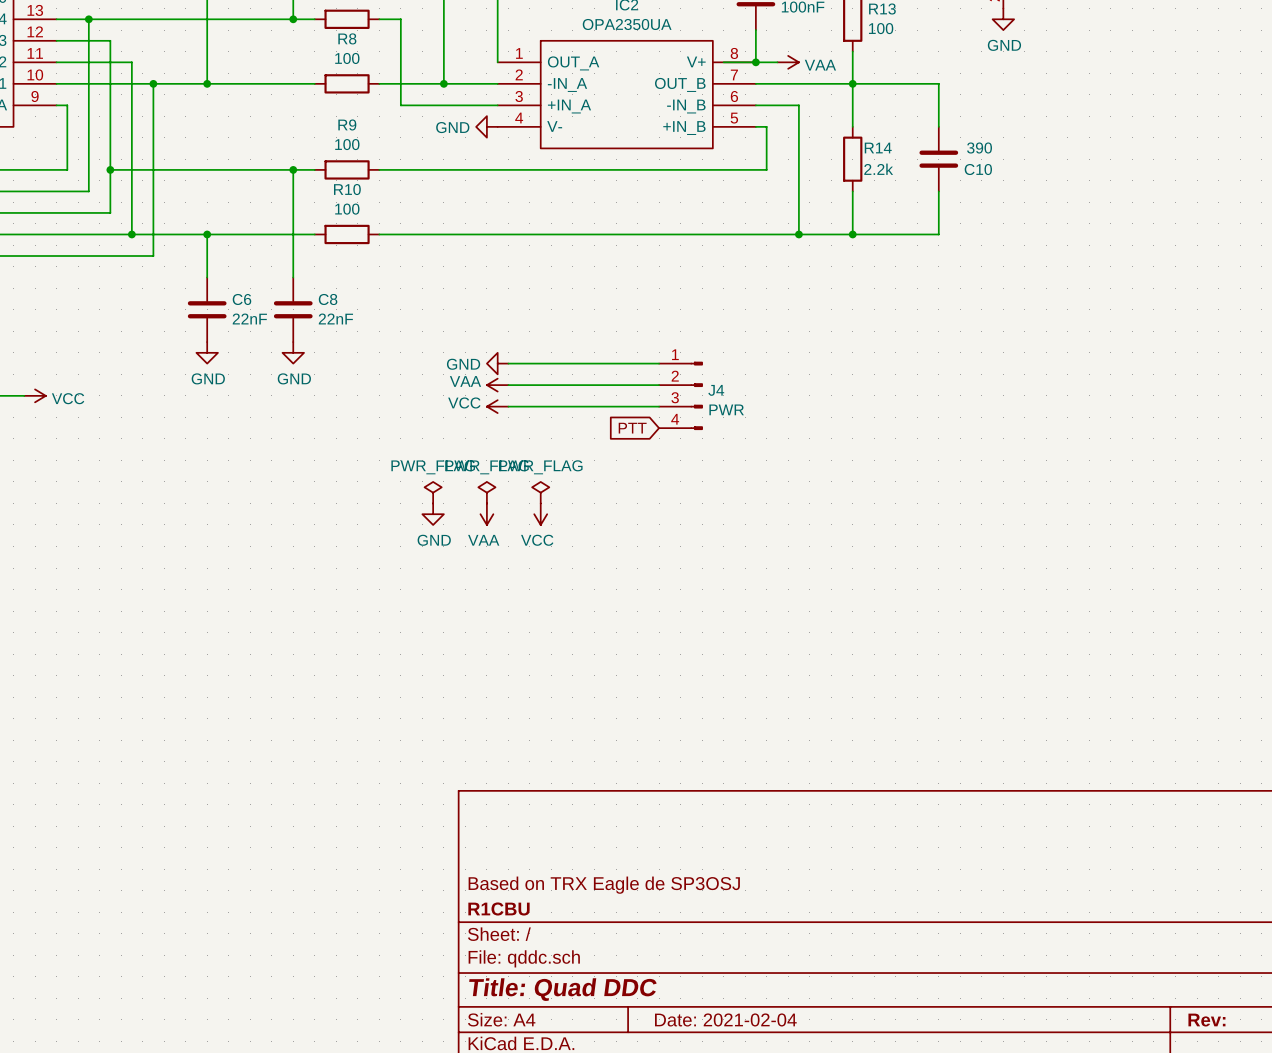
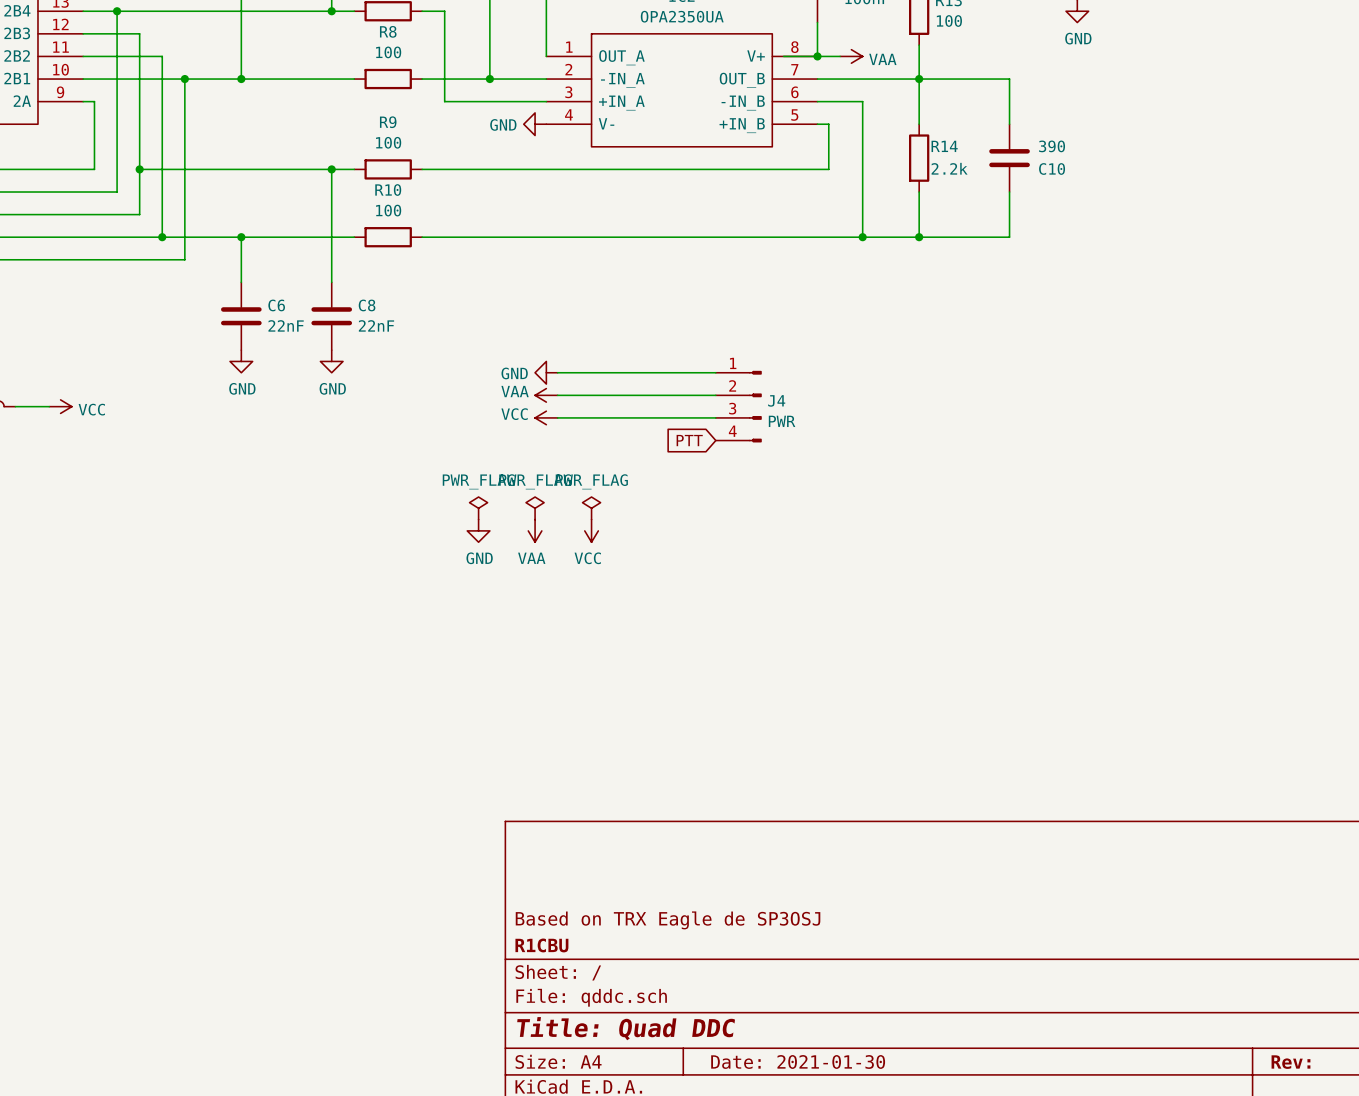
title block: Date: 2021-02-04 (725, 1019) -> Date: 2021-01-30 (798, 1061)

